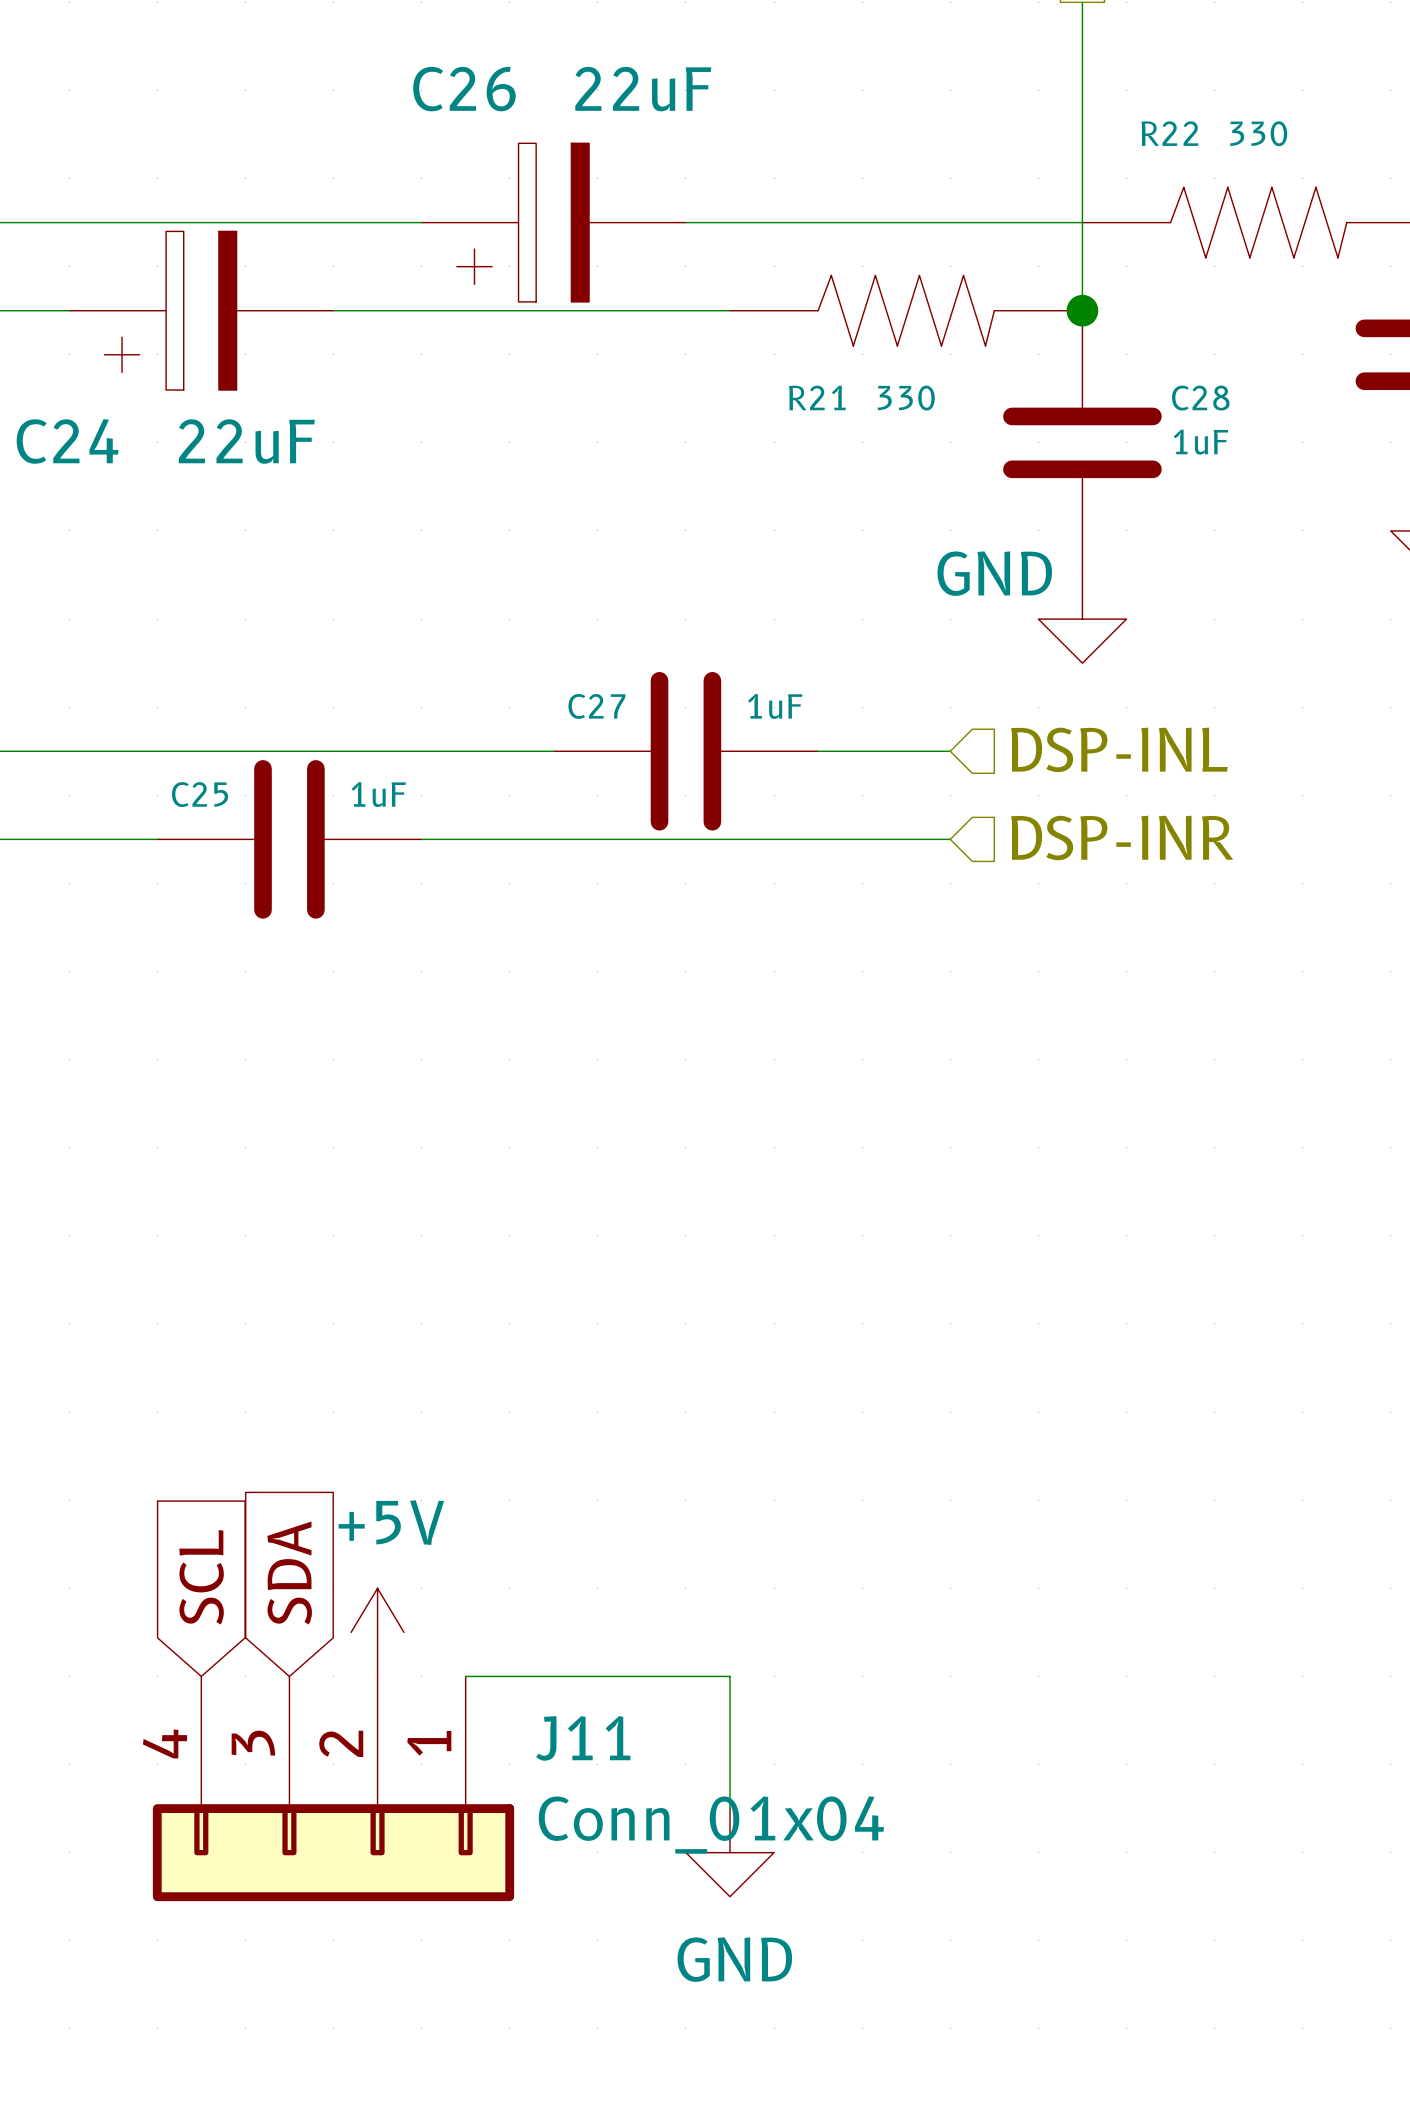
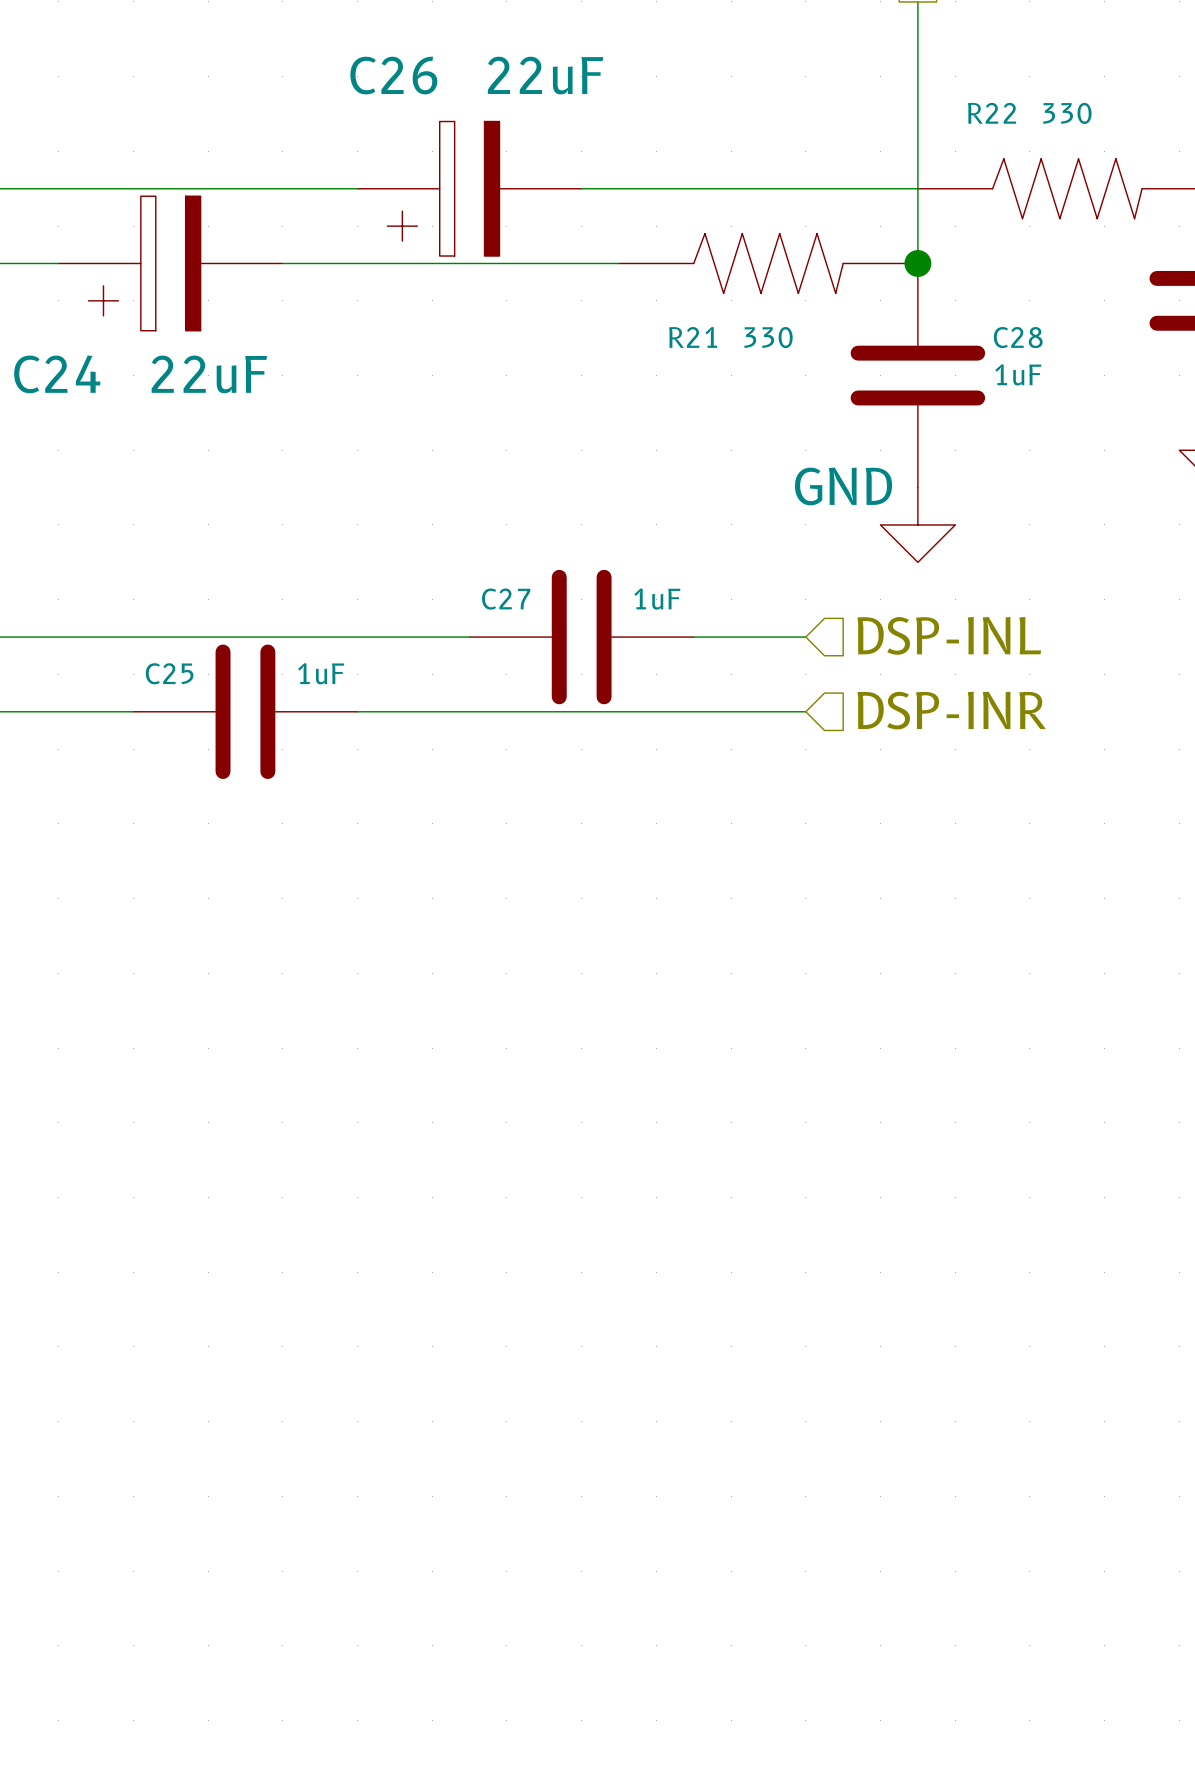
global label: SDA (289, 1573) -> none
global label: SCL (201, 1577) -> none
power symbol: +5V (377, 1632) -> none
wire: (465, 1676) (729, 1676) (729, 1808) -> none
J11: Conn_01x04 (333, 1788) -> none
power symbol: GND (729, 1852) -> none

